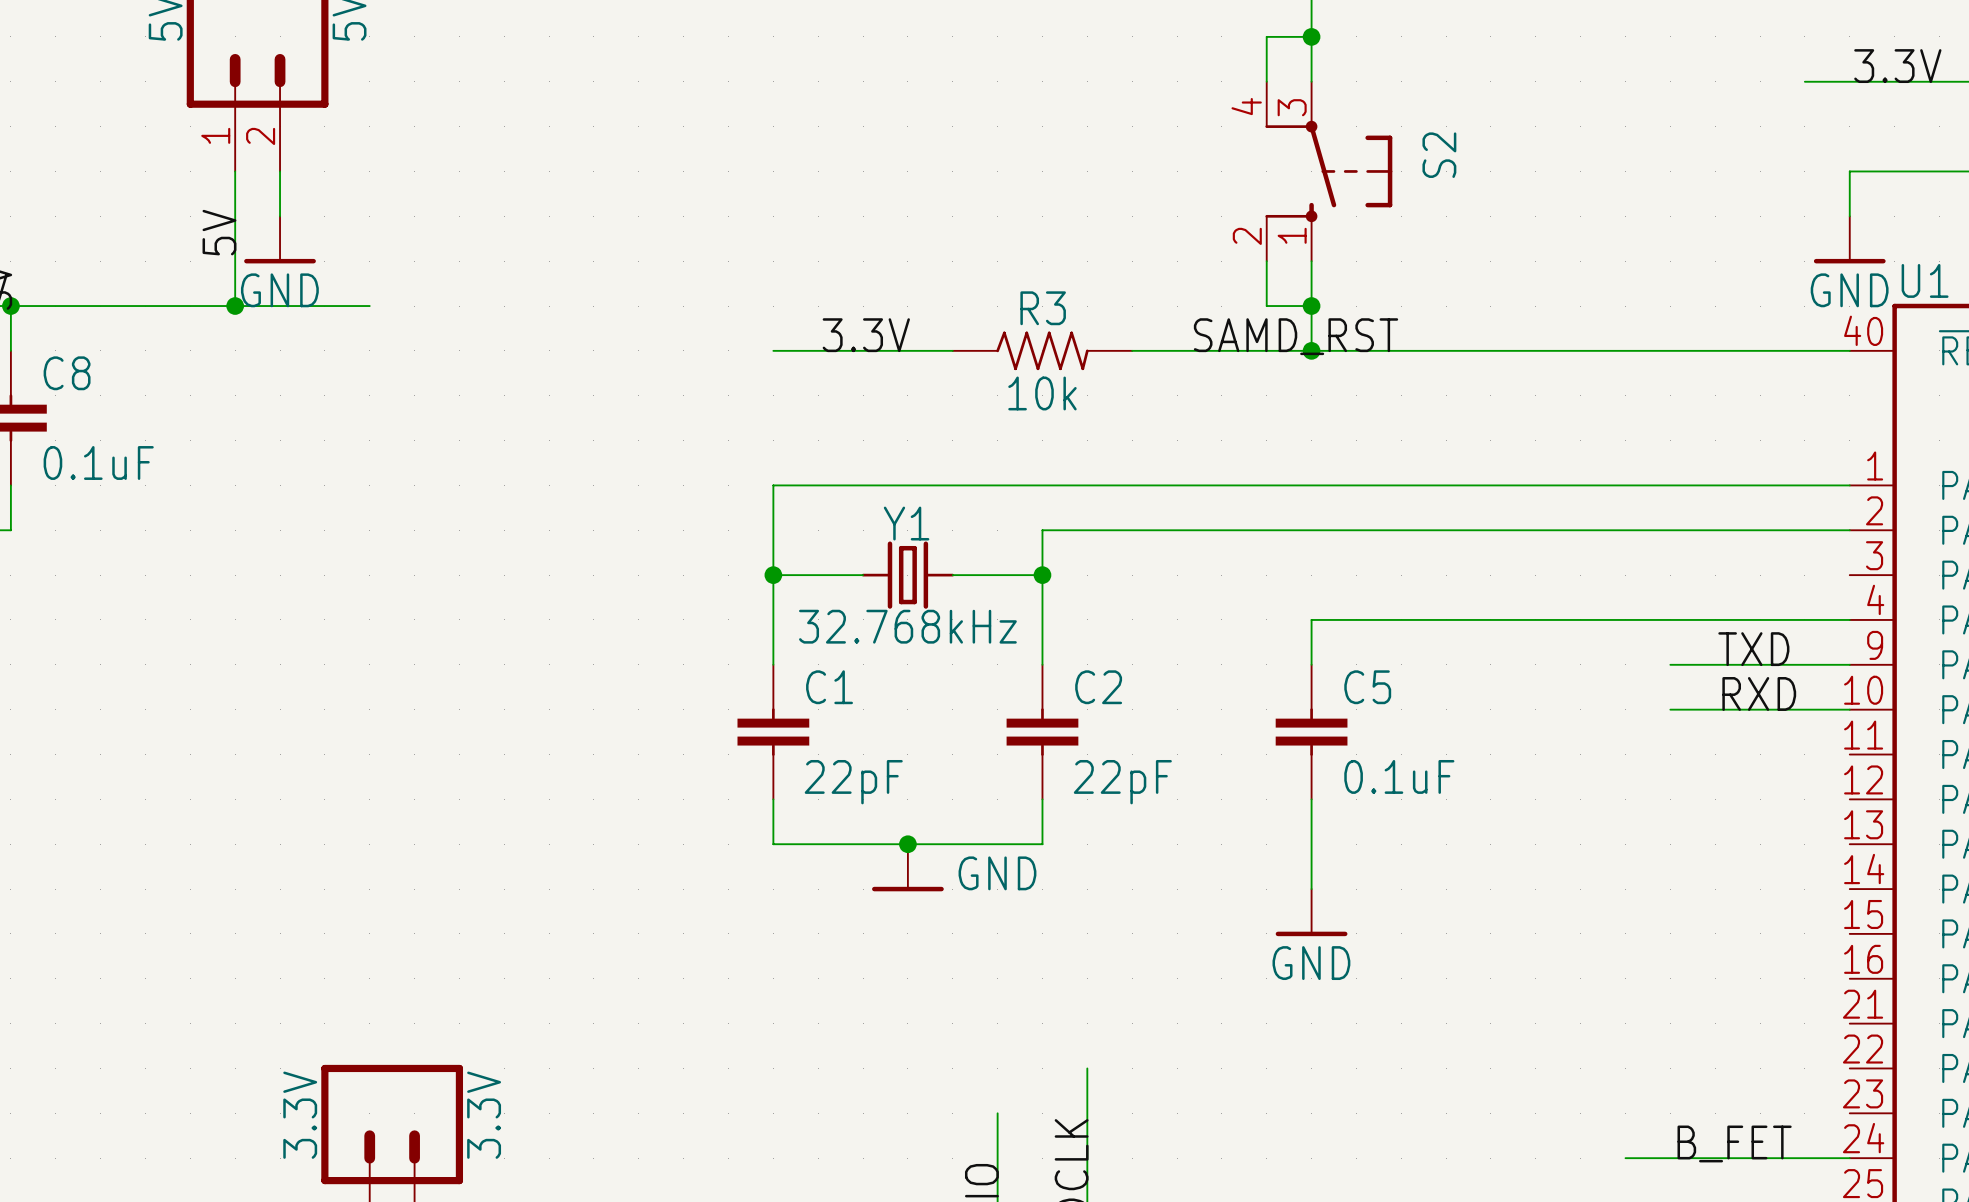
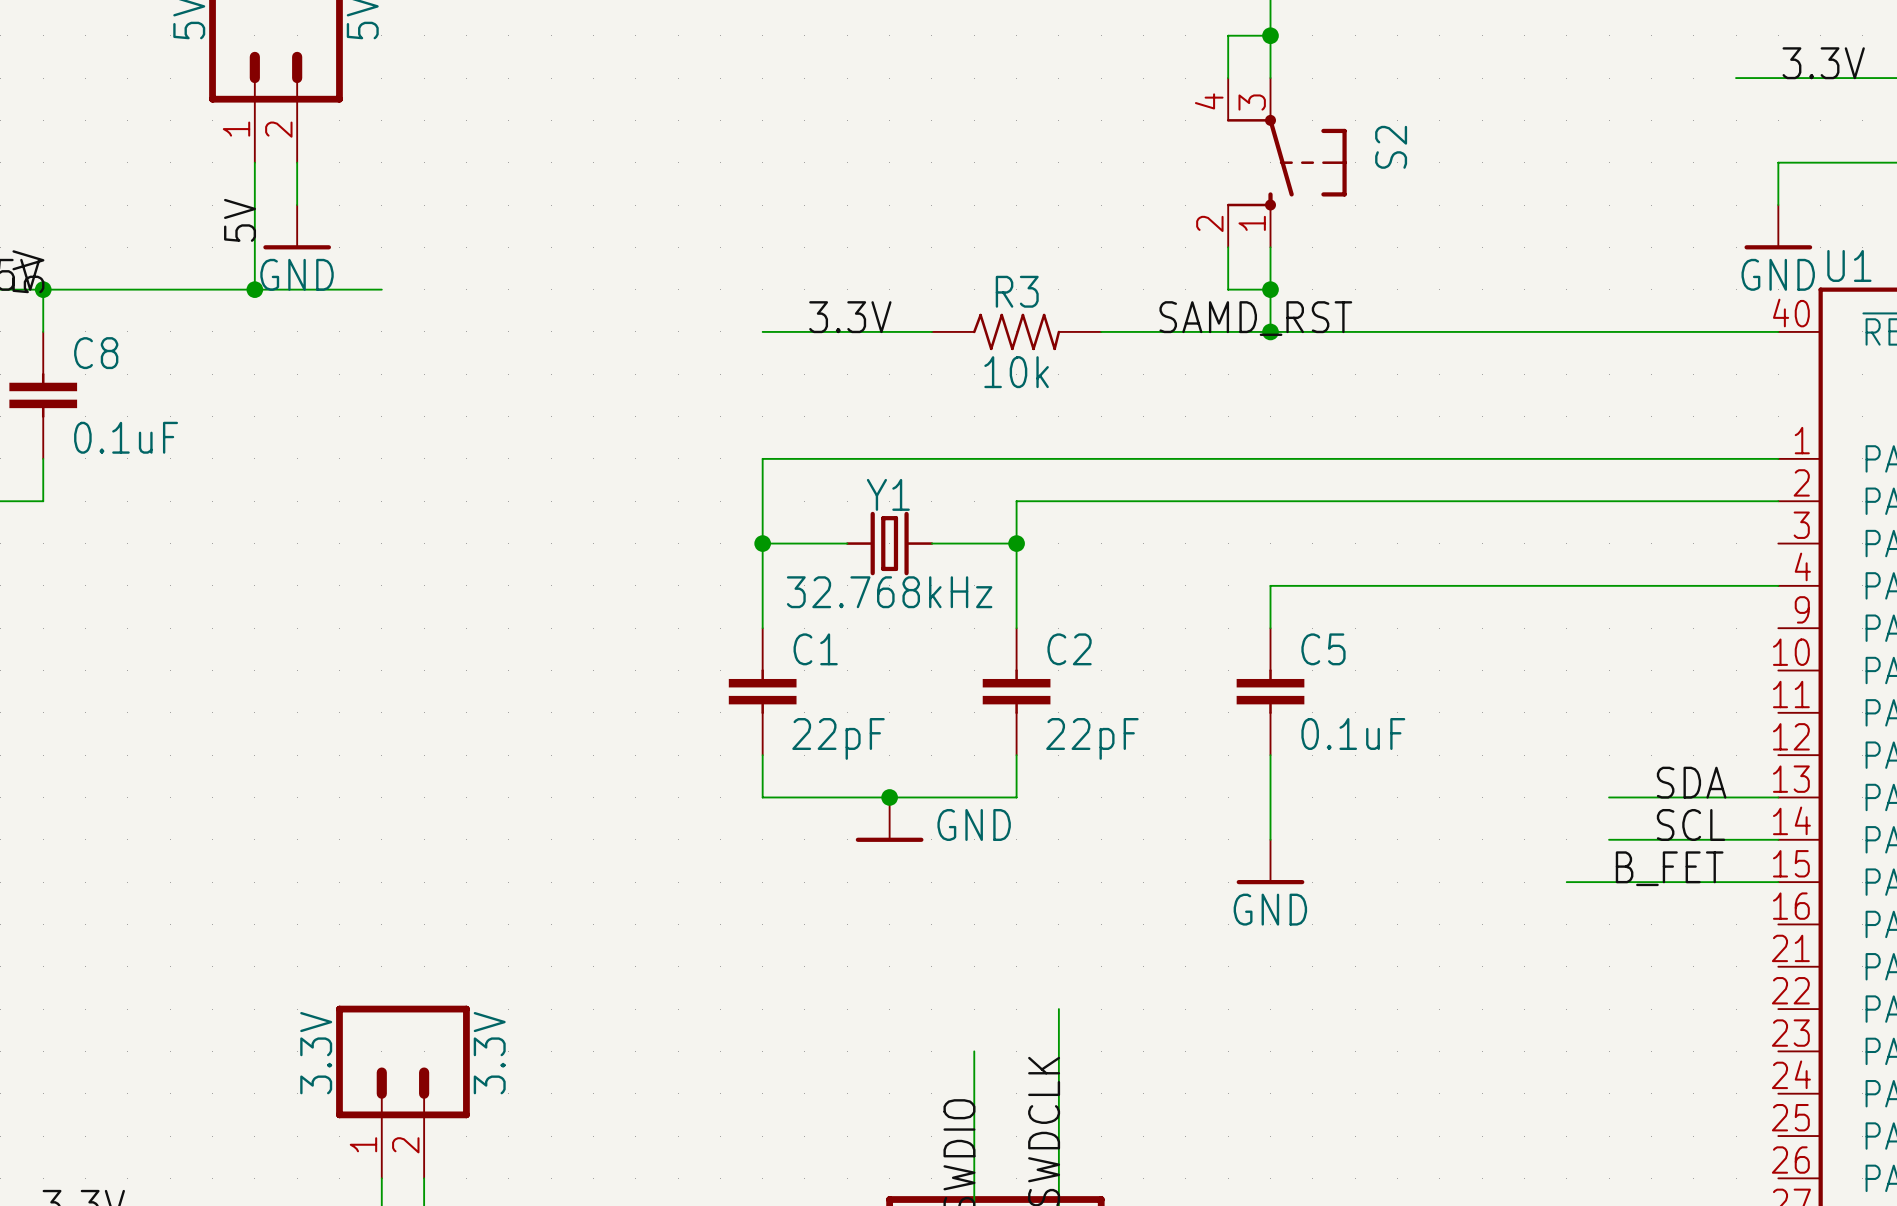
label: TXD (1753, 649) -> none
wire: (1670, 664) (1849, 664) -> (1609, 839) (1778, 839)
label: RXD (1759, 693) -> none
wire: (1670, 709) (1849, 709) -> (1609, 797) (1778, 797)
label: none -> SDA (1691, 782)
label: none -> SCL (1691, 824)
label position: B_FET (1734, 1143) -> B_FET (1669, 868)
wire: (1625, 1158) (1849, 1158) -> (1566, 882) (1778, 882)

